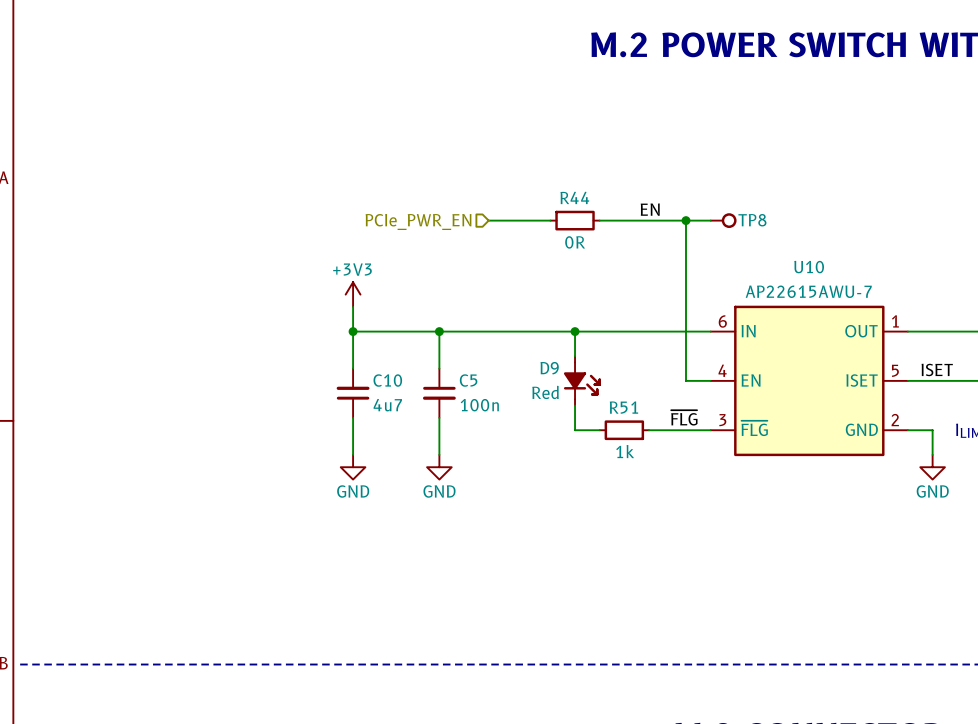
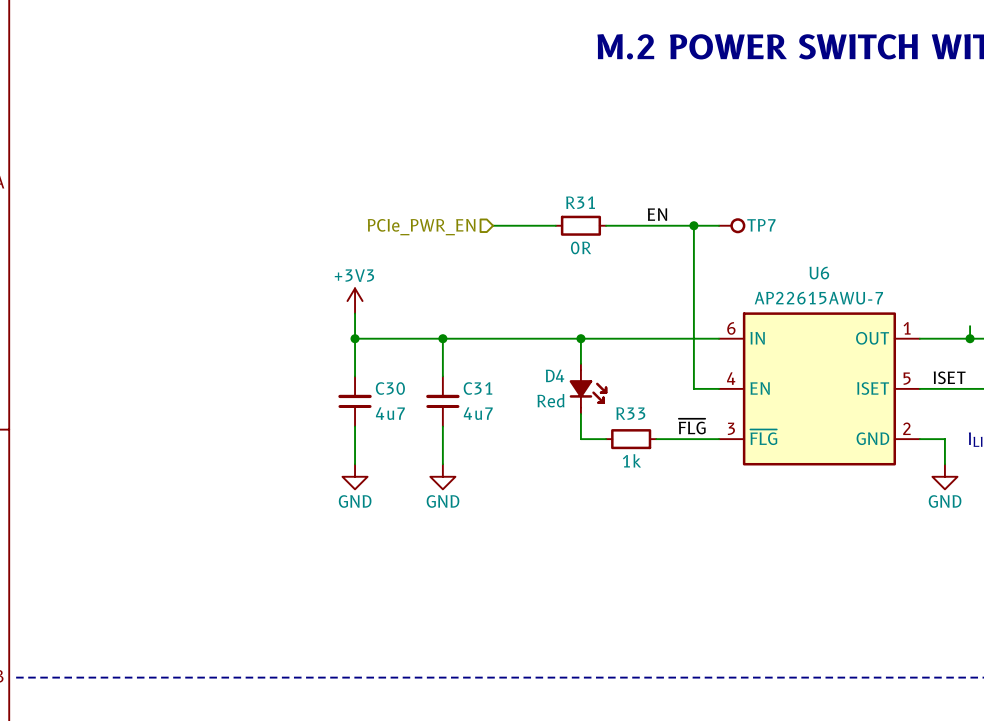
R44 name: R44 (574, 197) -> R31 (580, 202)
TP8 name: TP8 (752, 220) -> TP7 (761, 225)
U10 name: U10 (809, 267) -> U6 (819, 273)
wire: none -> (970, 326) (970, 338)
junction: none -> (970, 338)
D9 name: D9 (549, 368) -> D4 (555, 375)
C10 name: C10 (387, 380) -> C30 (390, 388)
C5: (439, 393) -> none
C31: none -> (442, 401)
R51 name: R51 (623, 407) -> R33 (630, 413)

